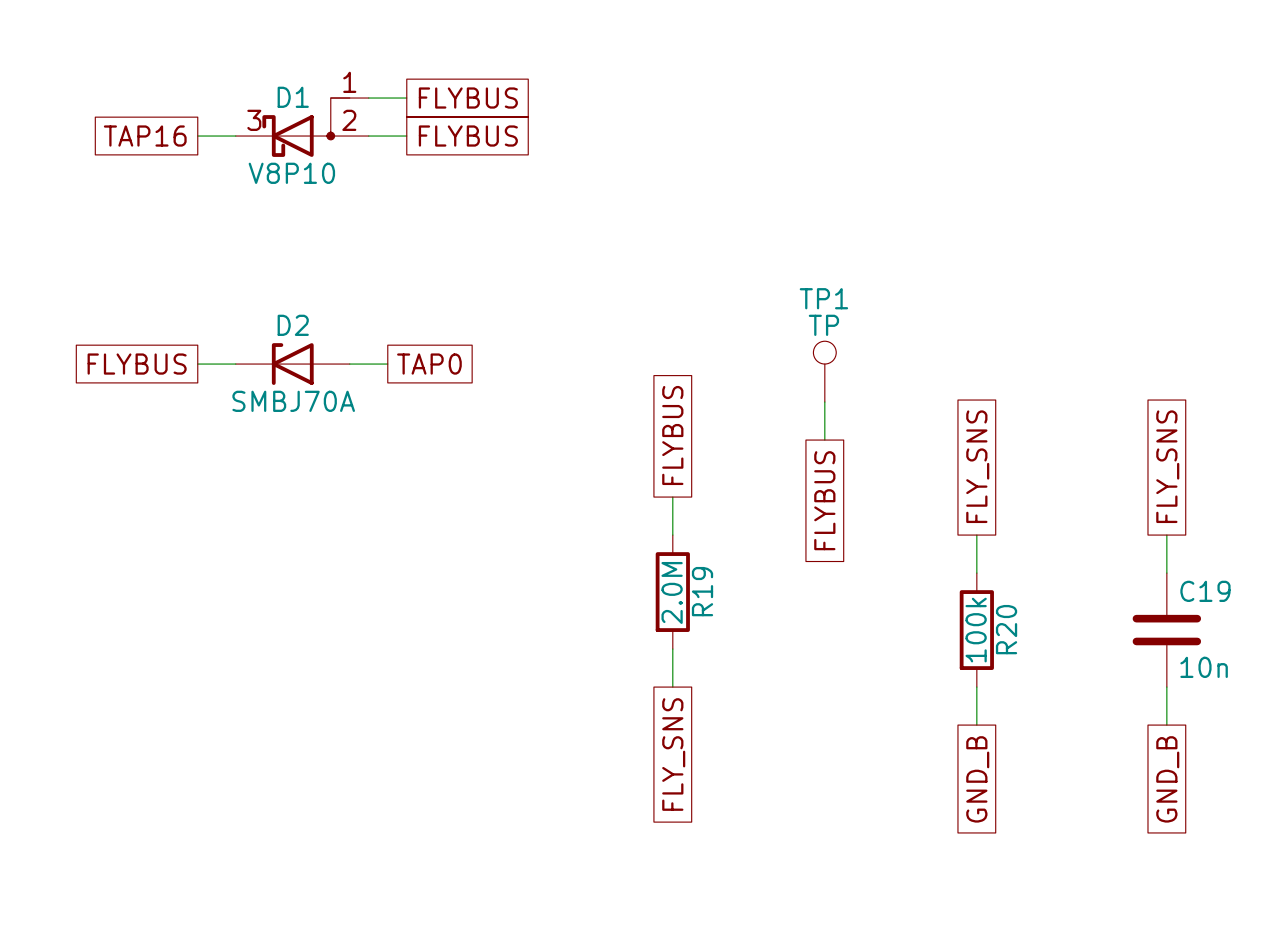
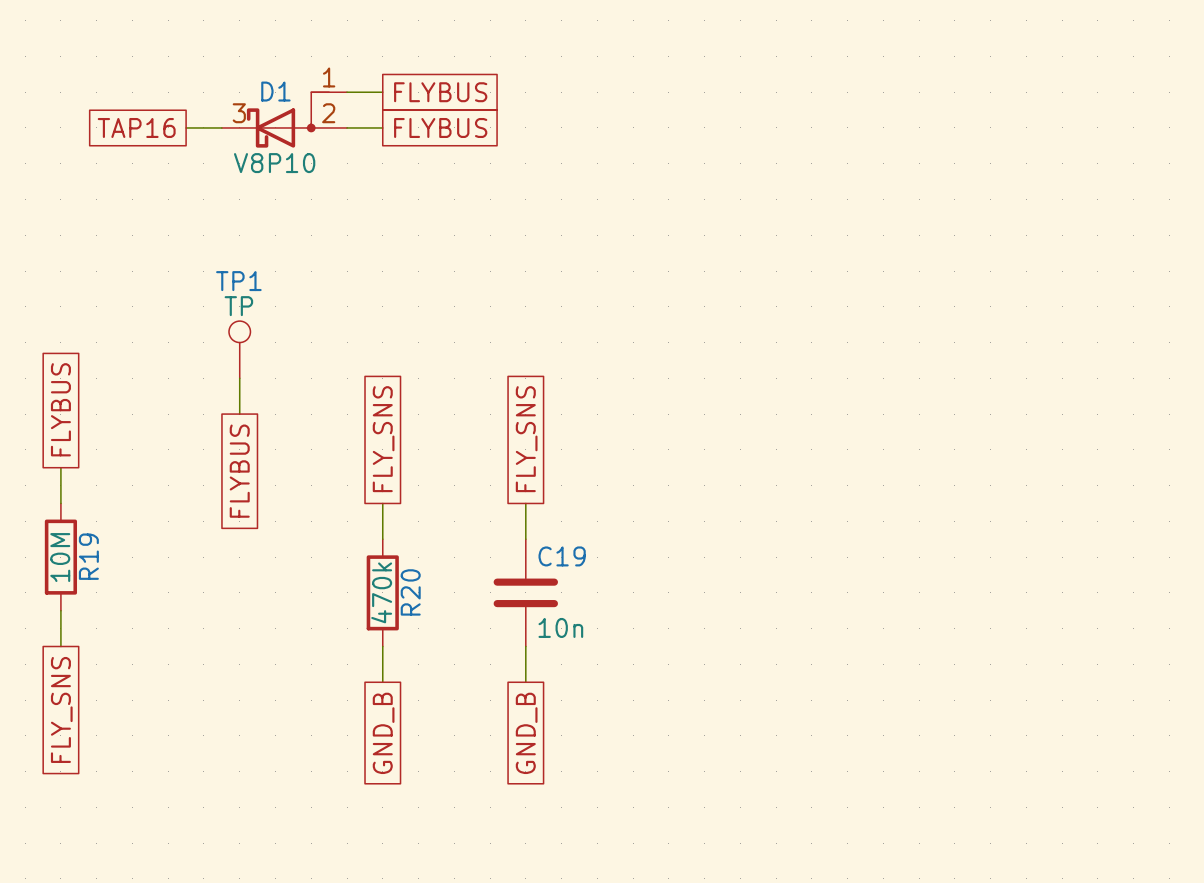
global label rotation: 0° (137, 364) -> 90° clockwise (60, 409)
wire: (197, 364) (235, 364) -> none
D2: SMBJ70A (292, 364) -> none
wire: (349, 364) (387, 364) -> none
global label: TAP0 (429, 364) -> none
TP1 position: (824, 371) -> (239, 349)
wire: none -> (239, 378) (239, 414)
wire: (824, 402) (824, 440) -> none
global label: FLYBUS (672, 435) -> none
global label: none -> FLY_SNS (383, 439)
global label: none -> FLY_SNS (526, 439)
global label: FLY_SNS (977, 466) -> none
global label: FLY_SNS (1167, 466) -> none
wire: none -> (60, 467) (60, 503)
wire: (672, 497) (672, 535) -> (525, 503) (525, 539)
global label: none -> FLYBUS (239, 471)
global label: FLYBUS (824, 500) -> none
wire: none -> (382, 503) (382, 539)
wire: (976, 535) (976, 573) -> none
wire: (1166, 535) (1166, 573) -> none
R19 position: (672, 592) -> (60, 557)
R19 value: 2.0M (672, 592) -> 10M (60, 557)
R20 position: (976, 630) -> (382, 592)
R20 value: 100k (976, 630) -> 470k (381, 592)
C19 position: (1166, 630) -> (525, 592)
wire: none -> (60, 610) (60, 646)
wire: (672, 649) (672, 687) -> (525, 646) (525, 682)
wire: none -> (382, 646) (382, 682)
wire: (976, 687) (976, 725) -> none
wire: (1166, 687) (1166, 725) -> none
global label: none -> FLY_SNS (61, 709)
global label: FLY_SNS (673, 754) -> none
global label: none -> GND_B (383, 733)
global label: none -> GND_B (526, 733)
global label: GND_B (977, 779) -> none
global label: GND_B (1167, 779) -> none

